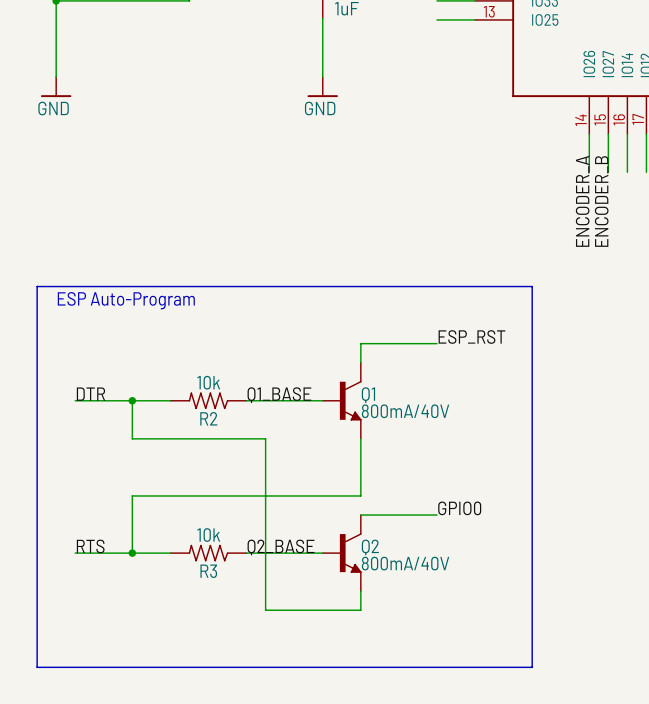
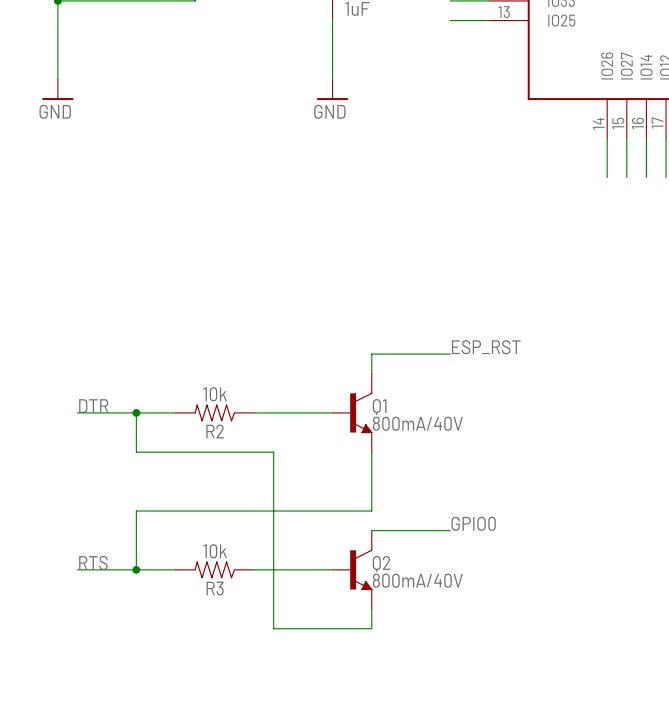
label: ENCODER_A (582, 201) -> none
label: ENCODER_B (601, 201) -> none
line: (37, 286) (532, 286) (532, 667) (37, 667) (37, 286) -> none
text: ESP Auto-Program (126, 300) -> none
label: Q1_BASE (279, 395) -> none
label: Q2_BASE (281, 547) -> none

